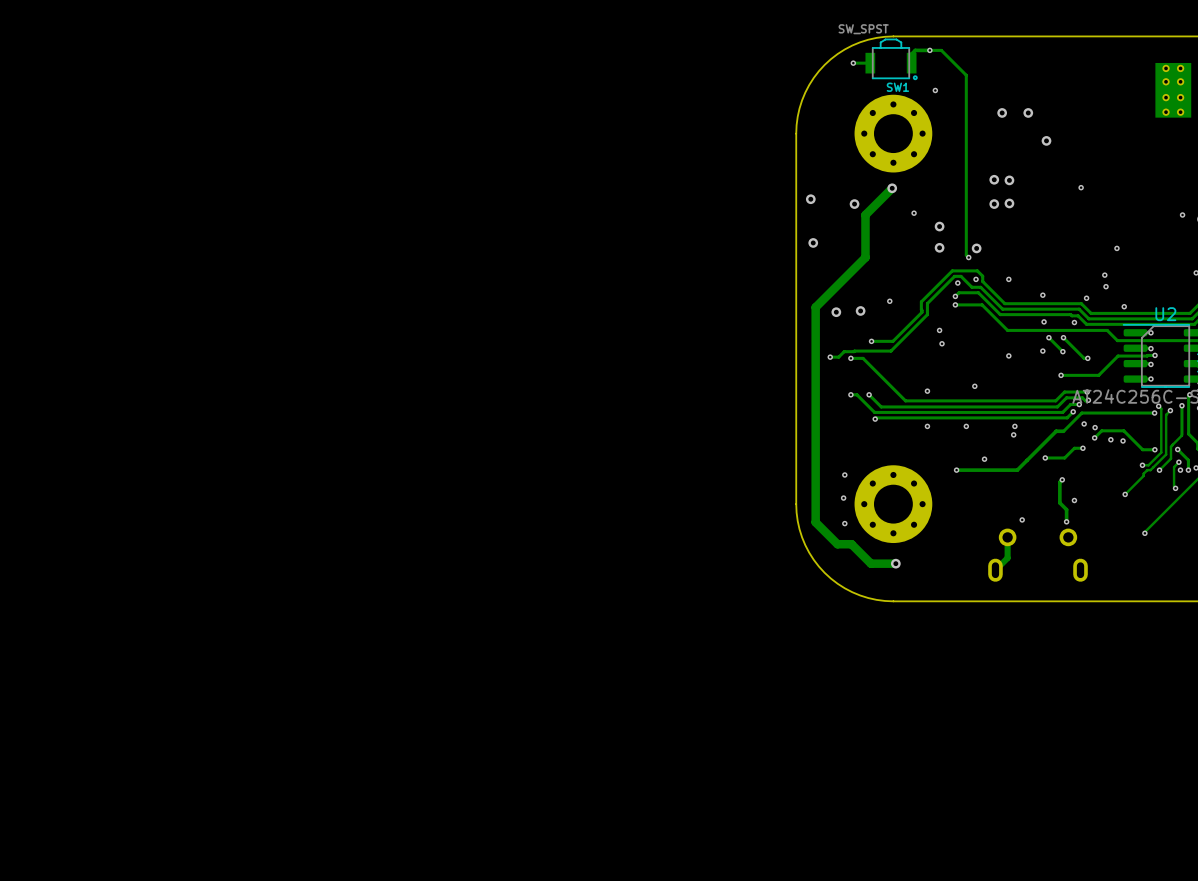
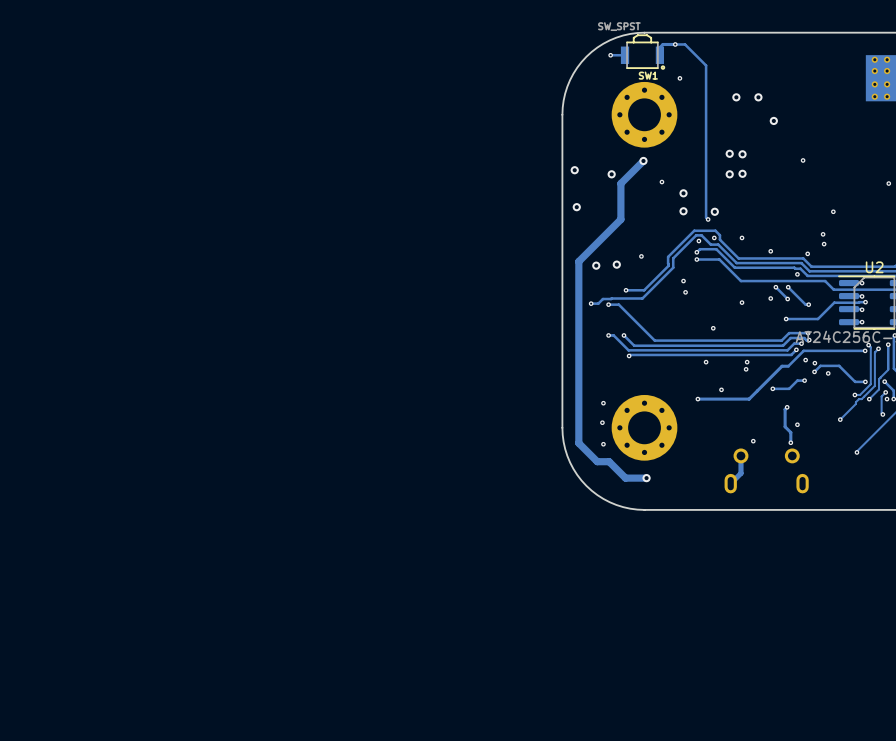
via: (1124, 306) -> none
via: (1044, 321) -> none
via: (927, 391) -> none
via: (927, 426) -> none
via: (1123, 440) -> none

